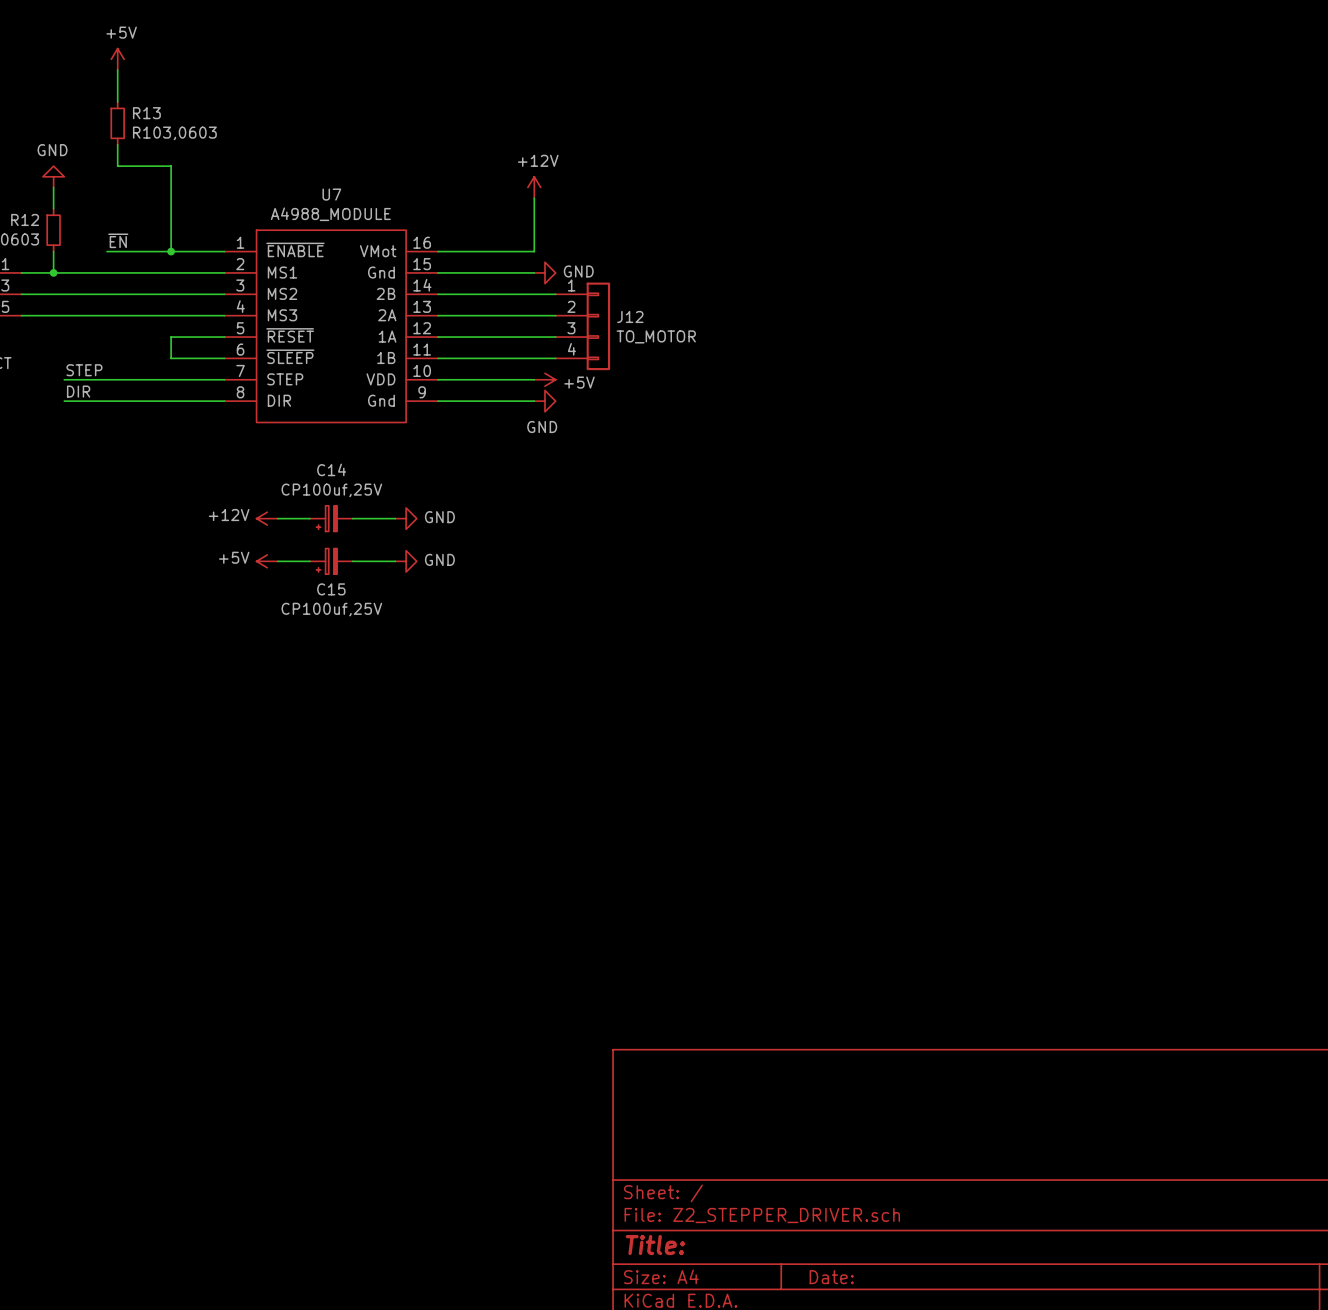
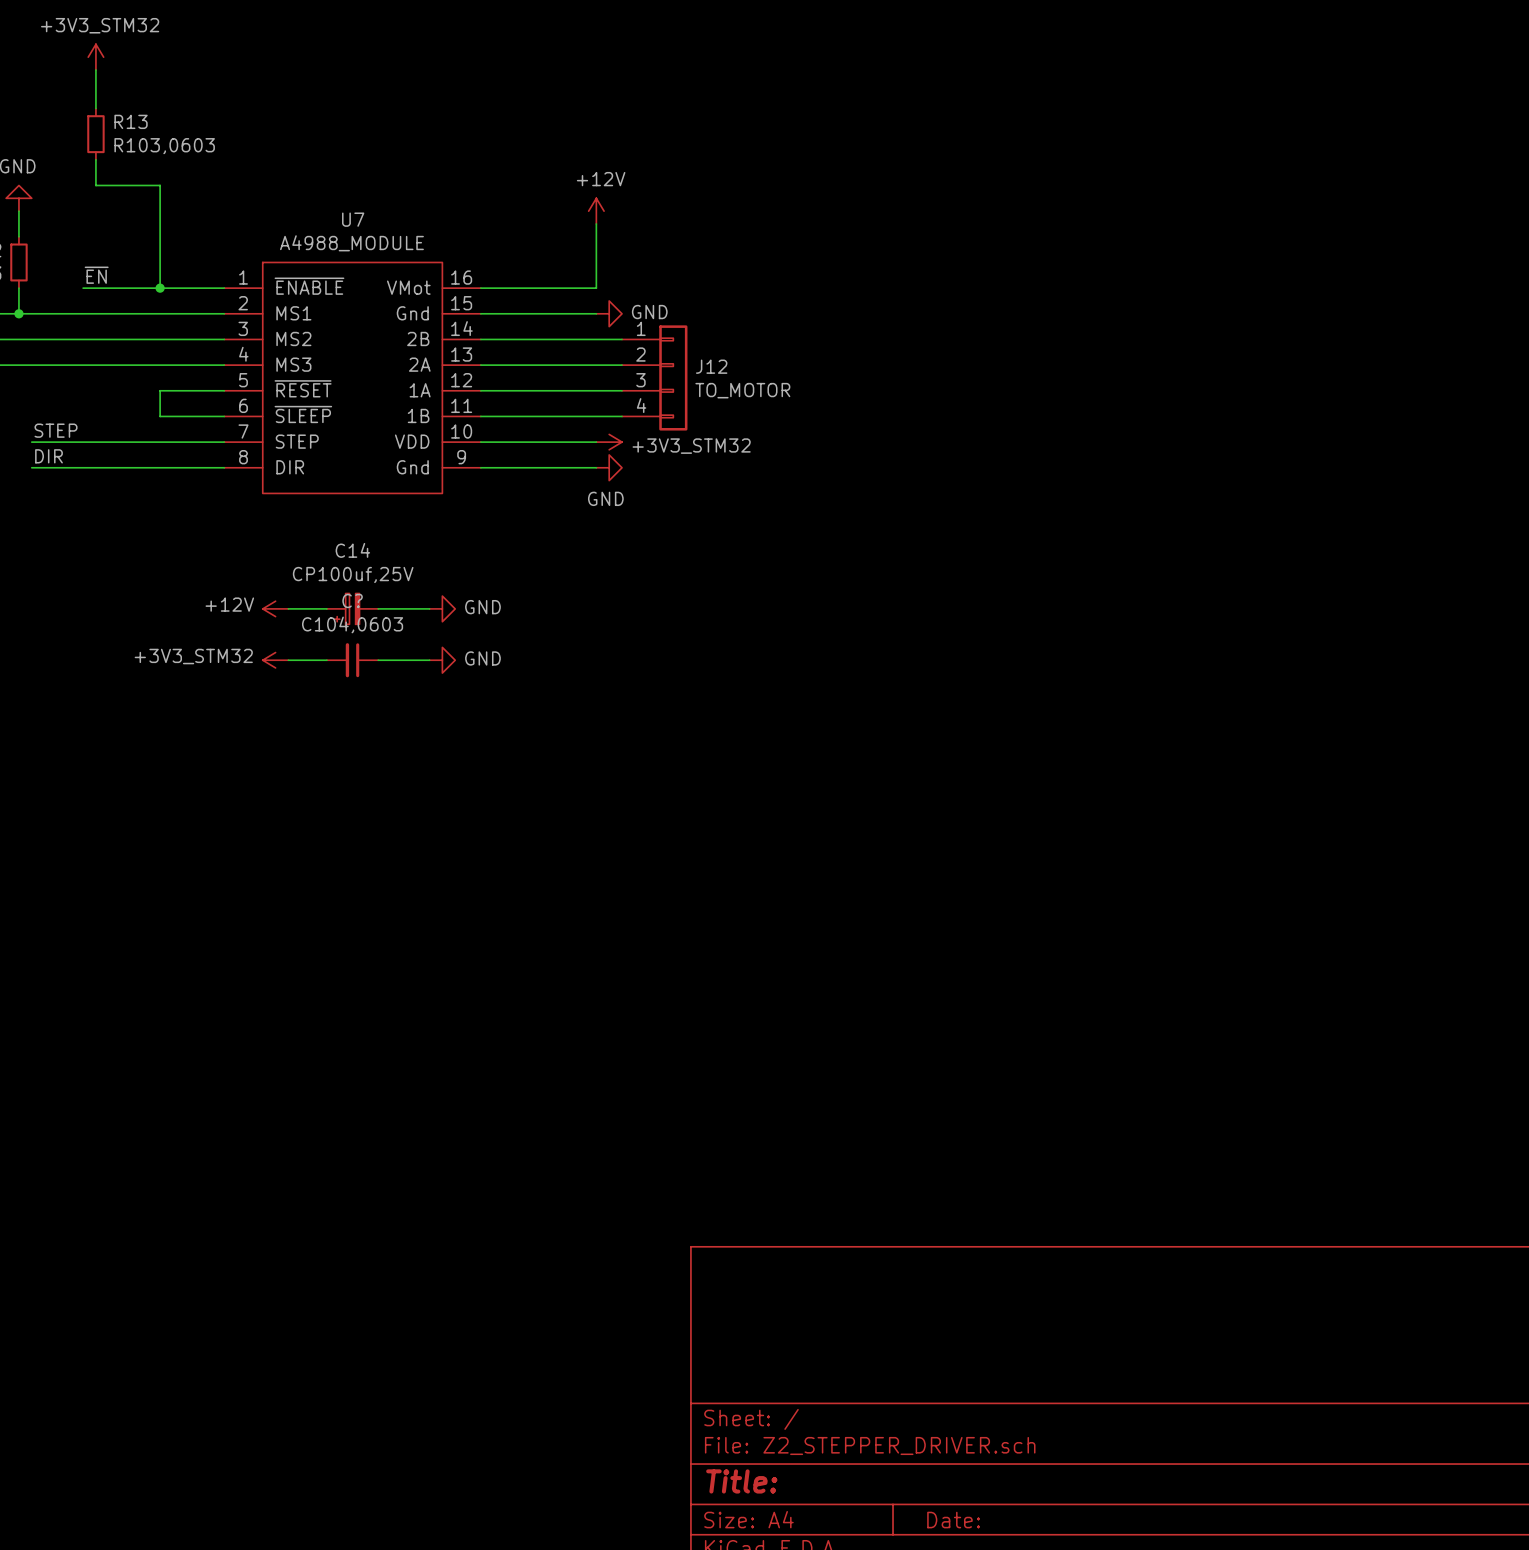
power symbol: +5V (117, 59) -> +3V3_STM32 (95, 57)
power symbol: +5V (544, 379) -> +3V3_STM32 (609, 442)
power symbol: +5V (267, 561) -> +3V3_STM32 (275, 660)
C15: CP100uf,25V (331, 561) -> none
C?: none -> C104,0603 (352, 660)

